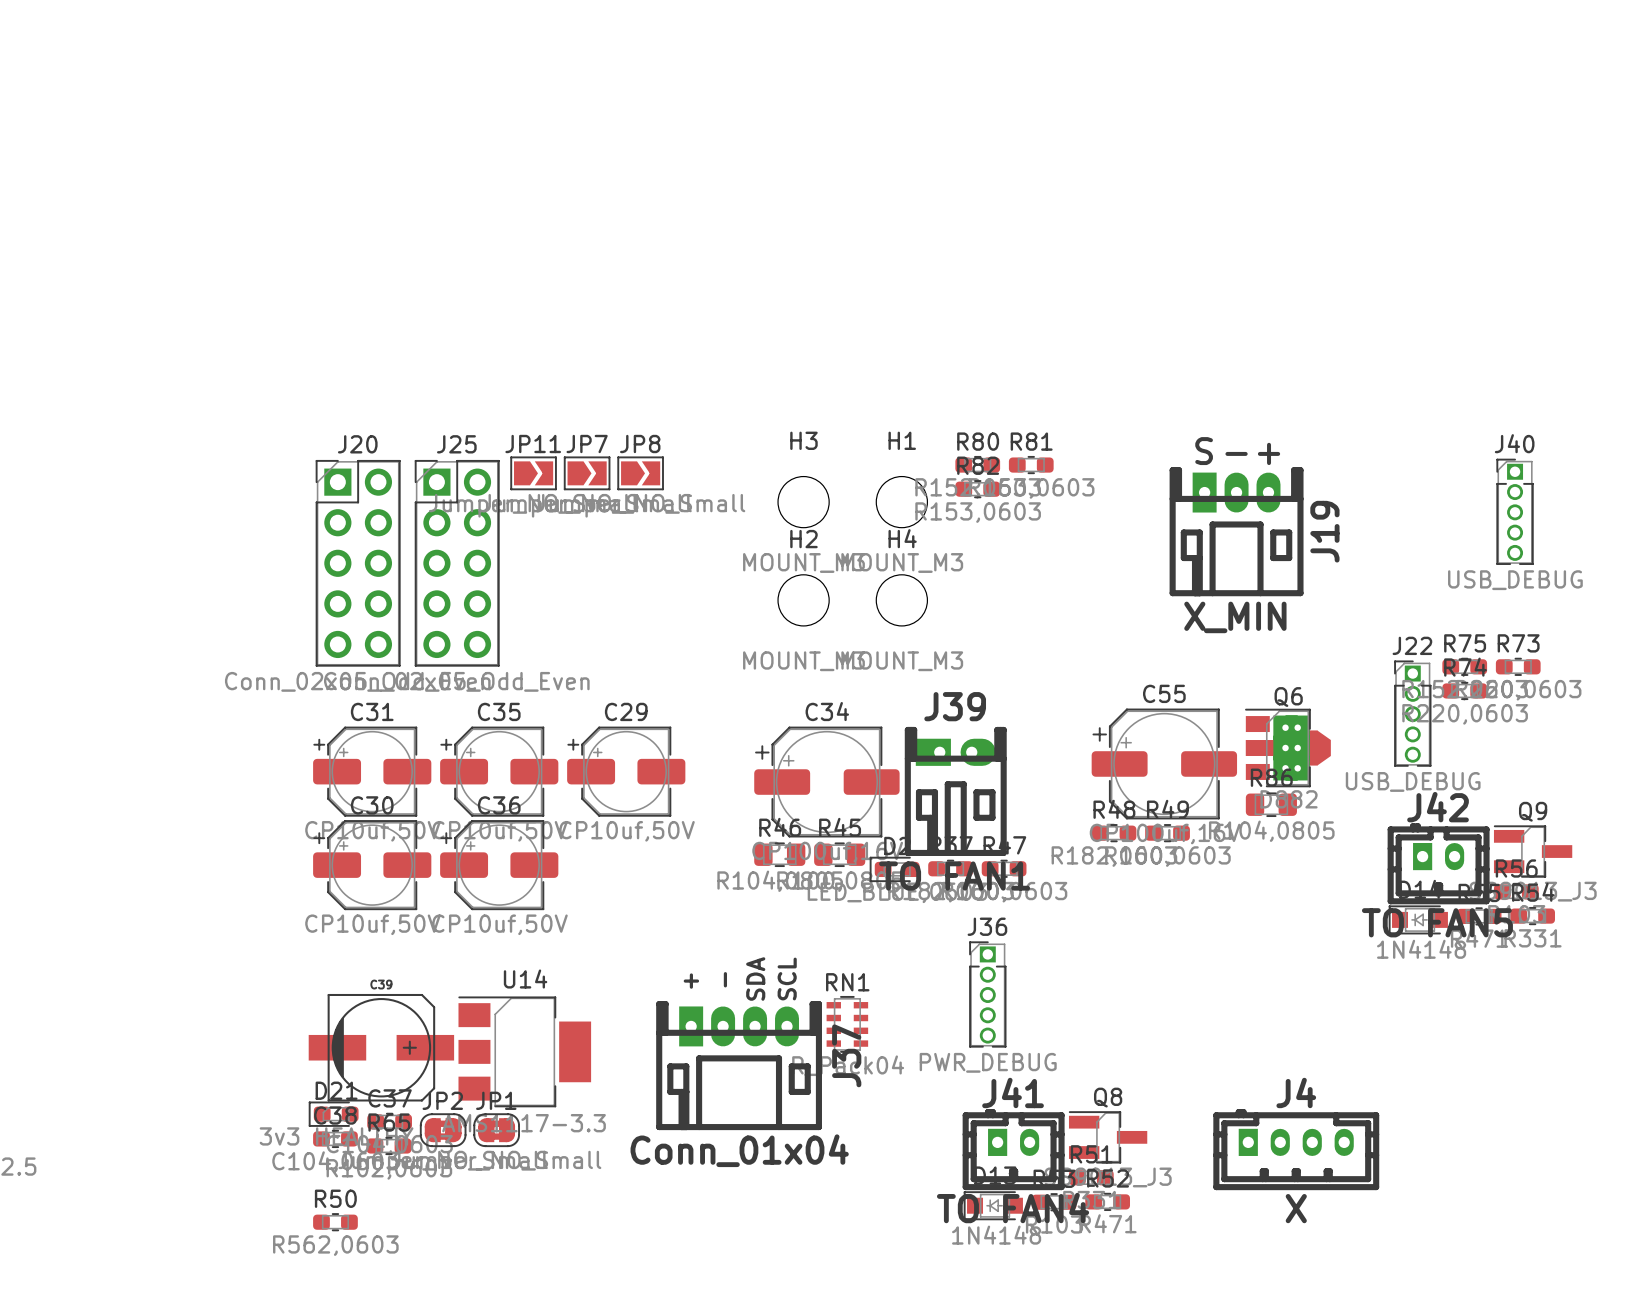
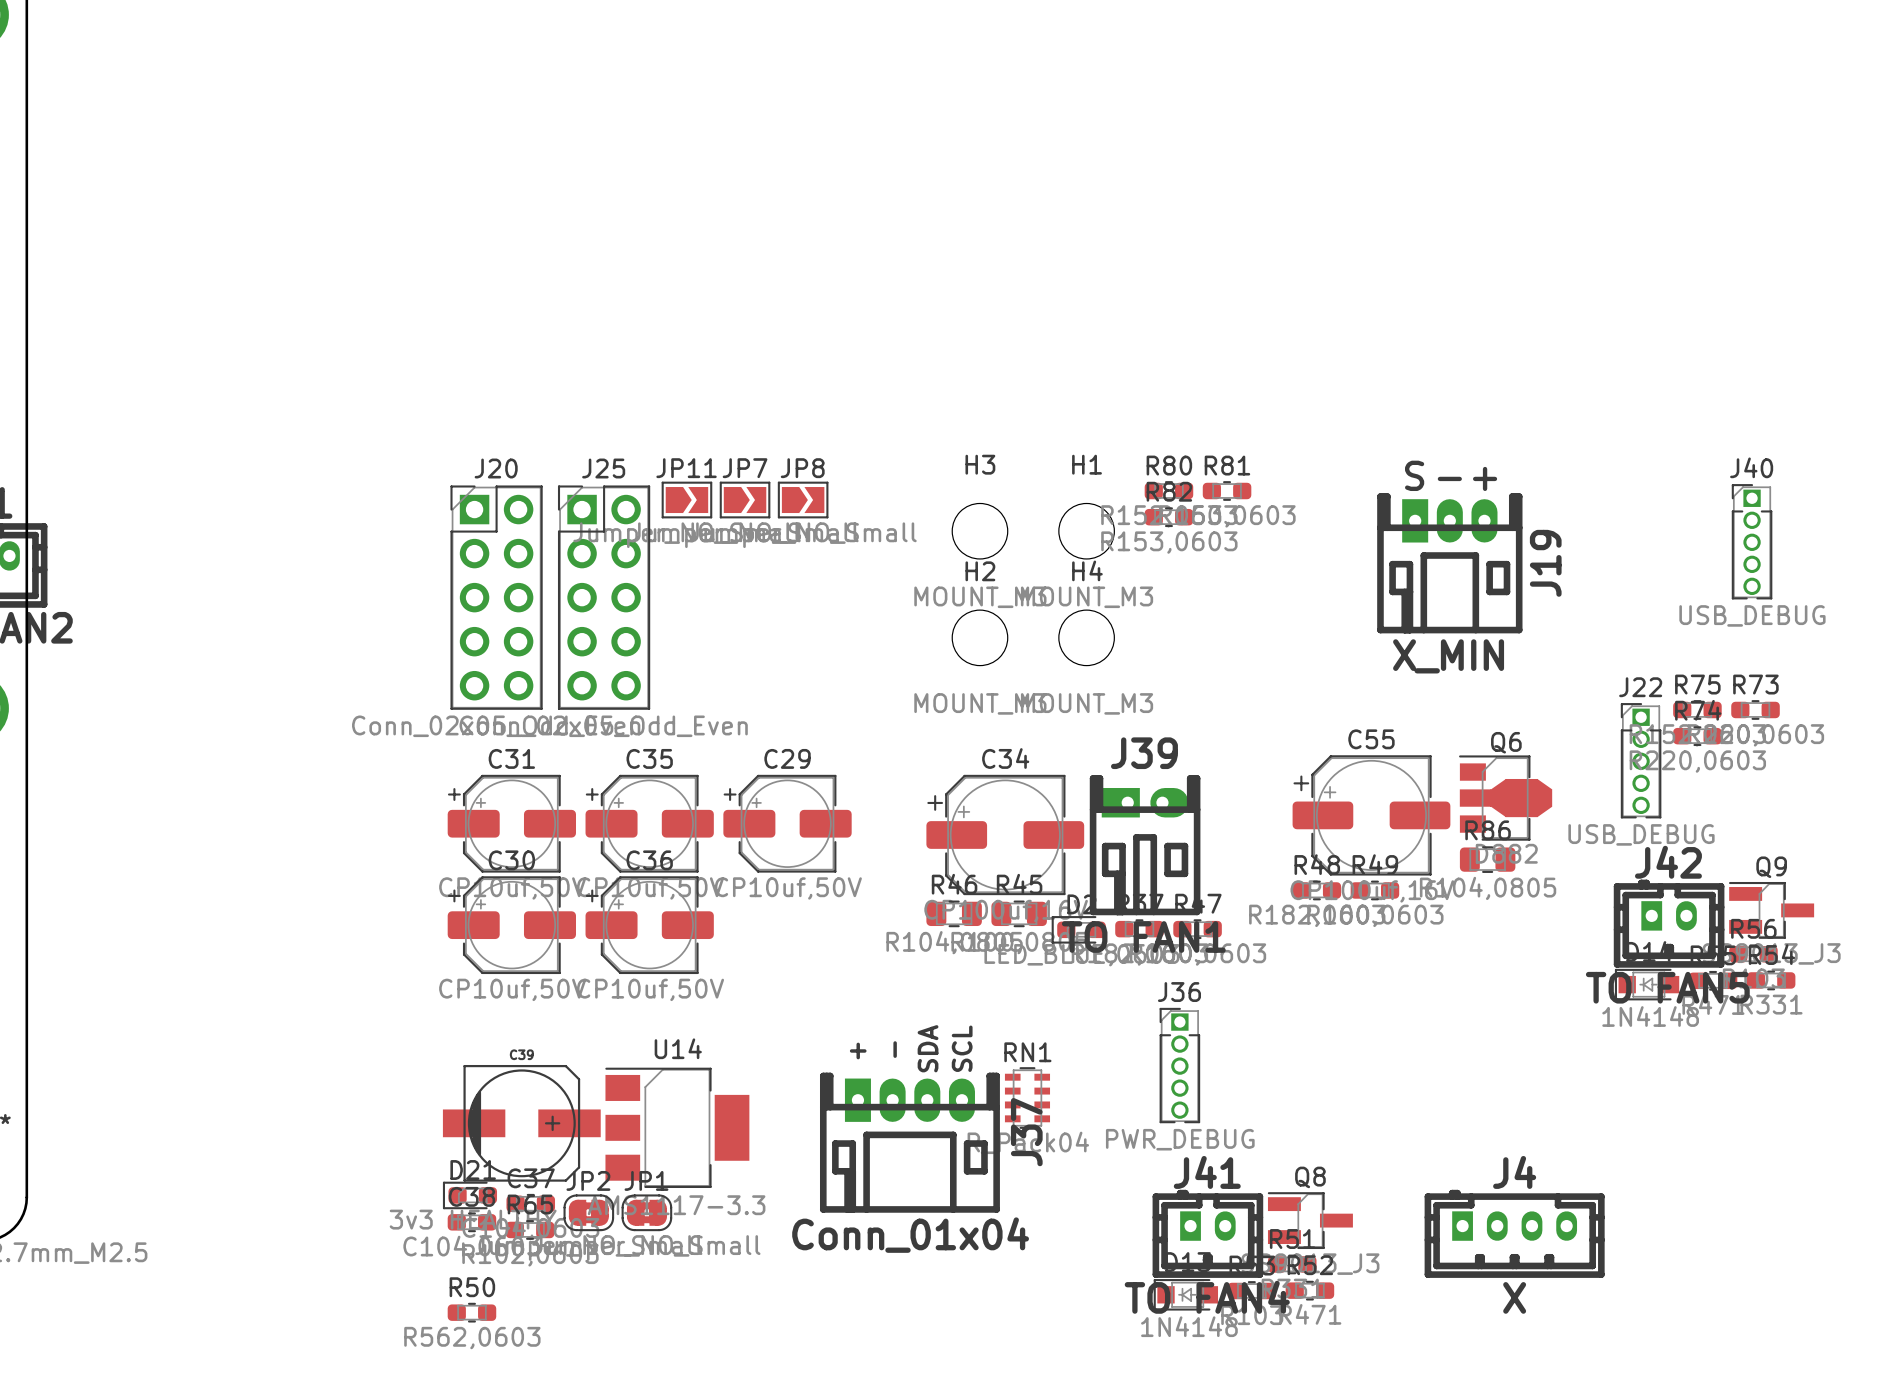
Q6 footprint: [1245, 708, 1331, 788] -> [1459, 755, 1553, 841]

